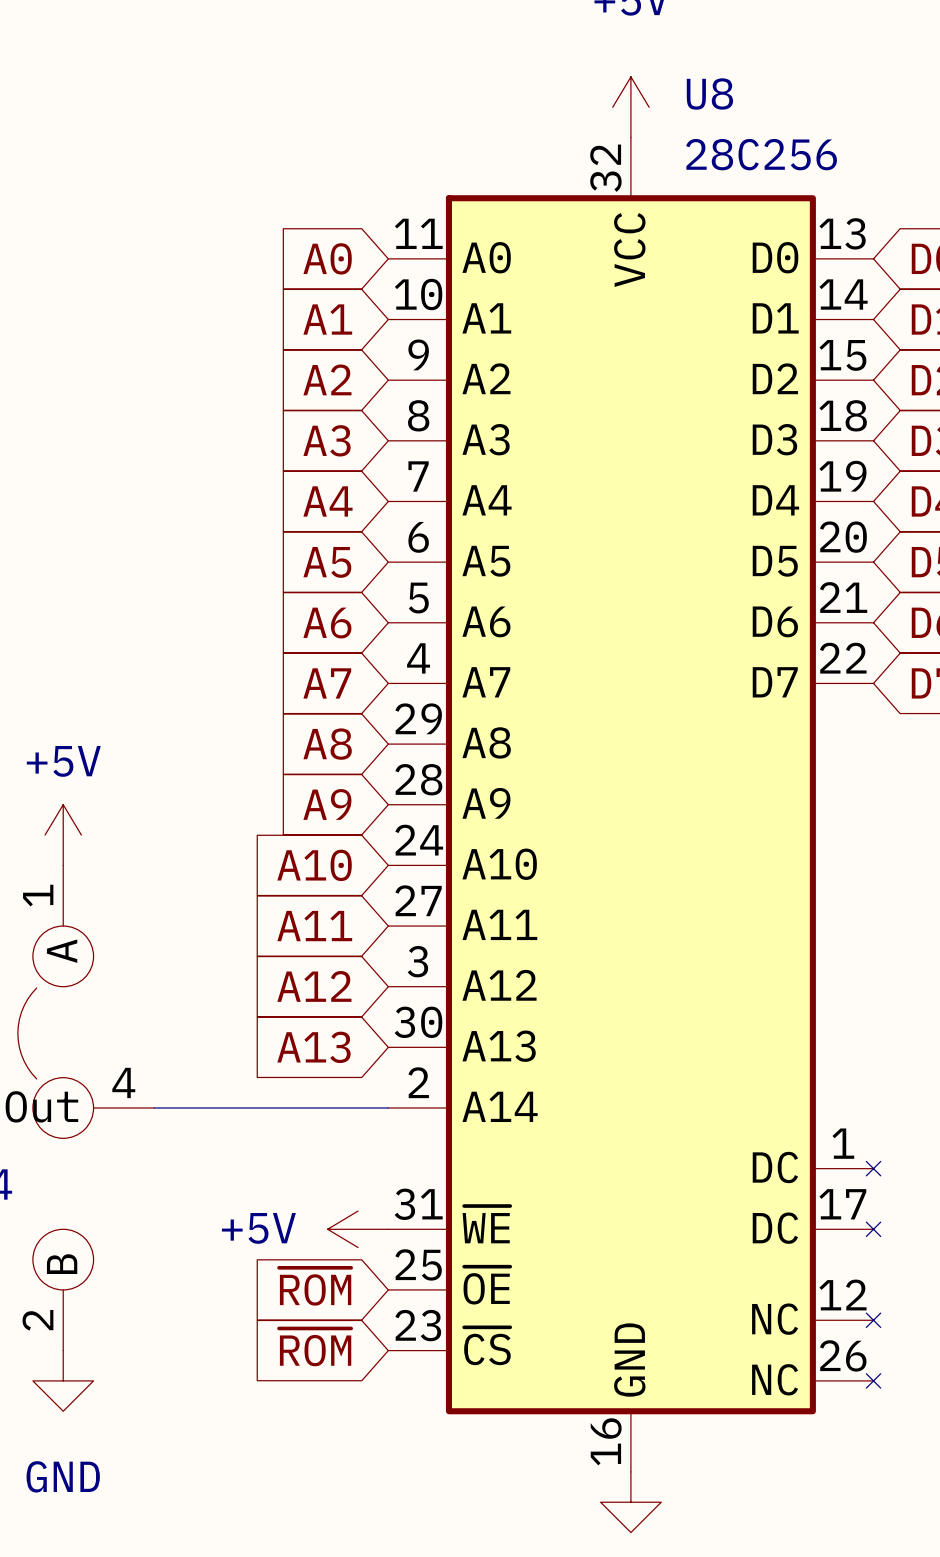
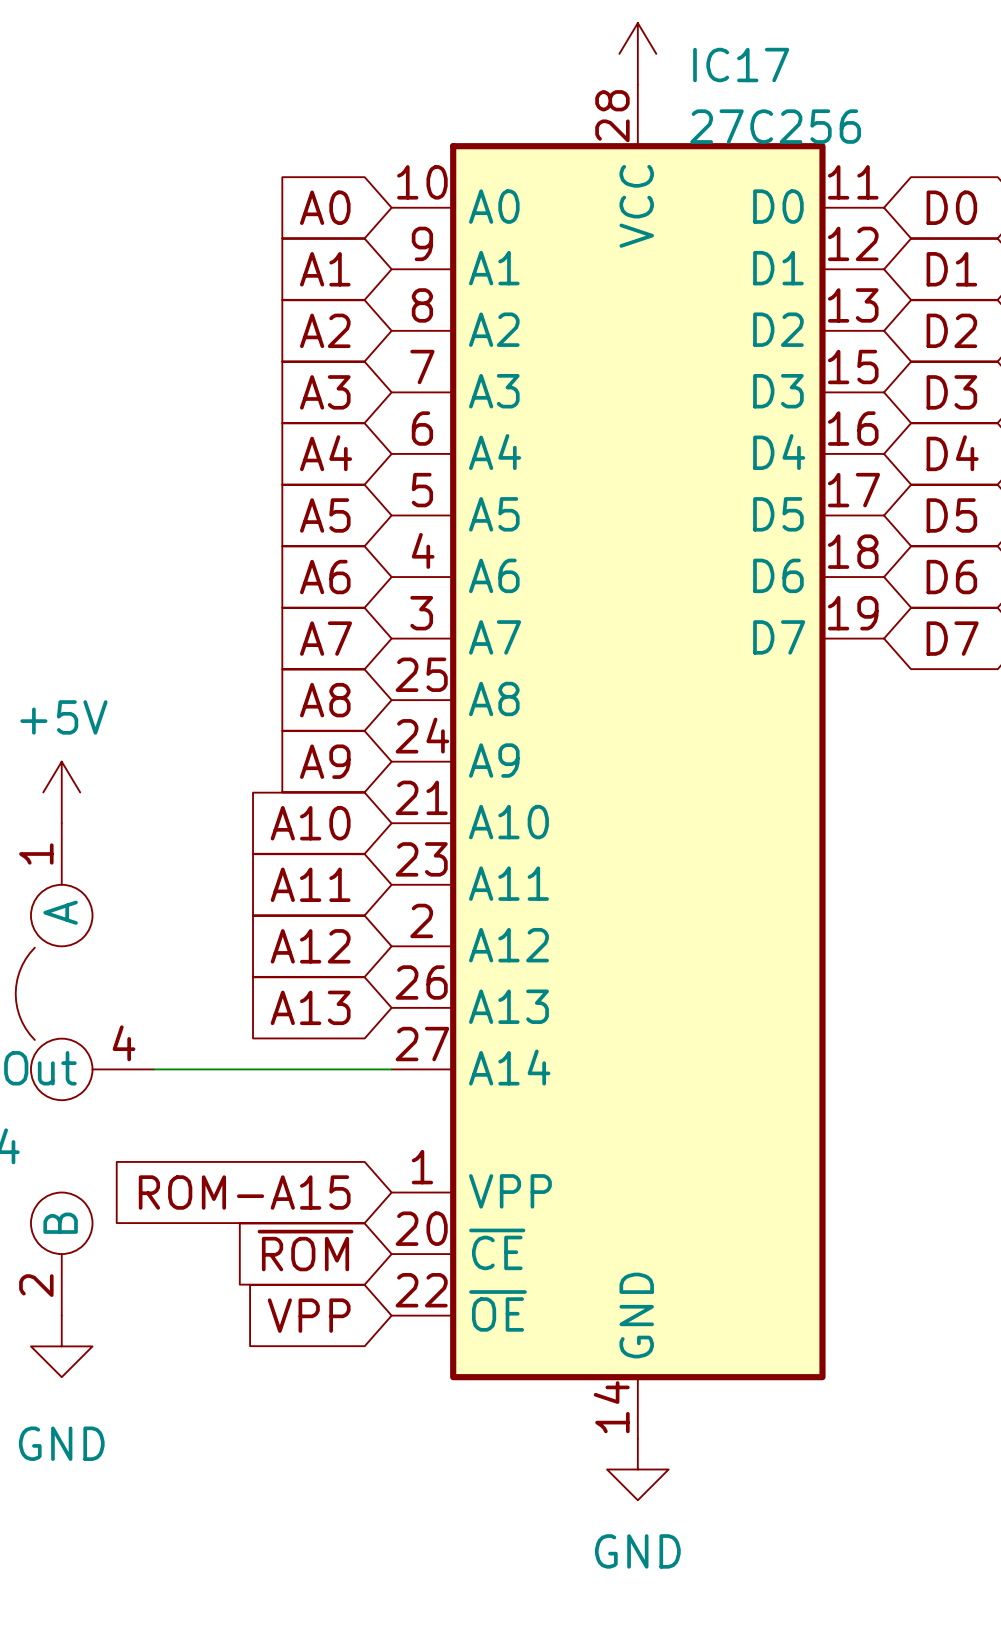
IC17: none -> 27C256 (637, 761)
U8: 28C256 (634, 804) -> none
global label: none -> ROM-A15 (244, 1192)
power symbol: +5V (358, 1229) -> none
global label: ~{ROM} (315, 1347) -> VPP (309, 1315)

